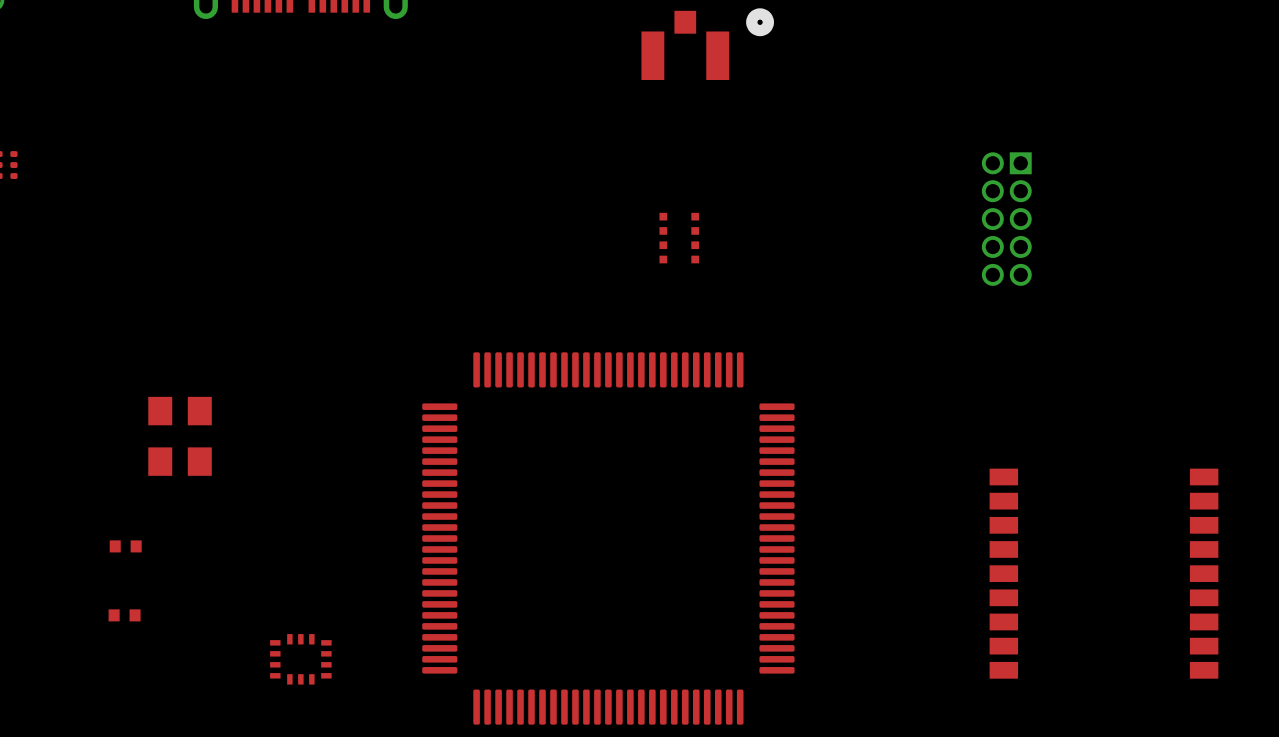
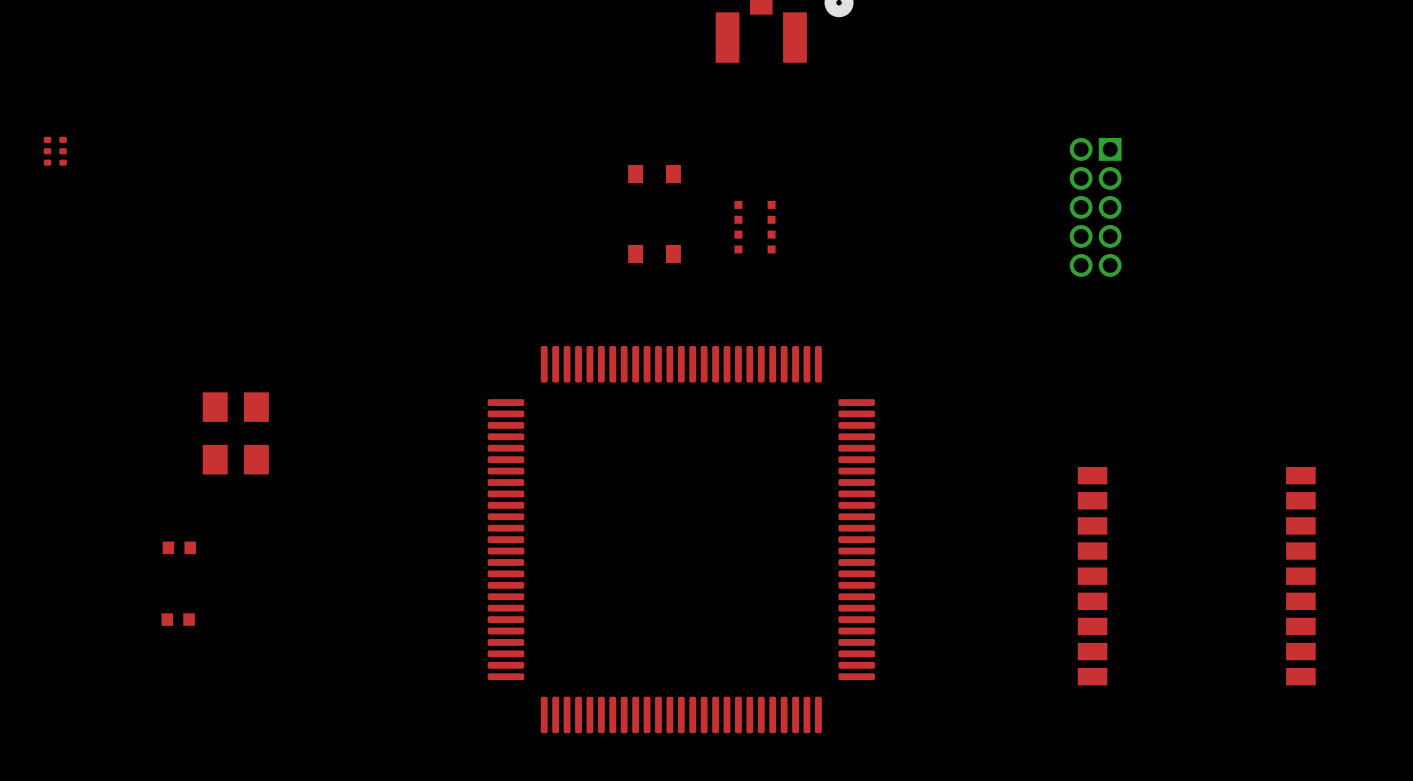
part: none -> (654, 174)
part: none -> (654, 254)
part: (300, 659) -> none

